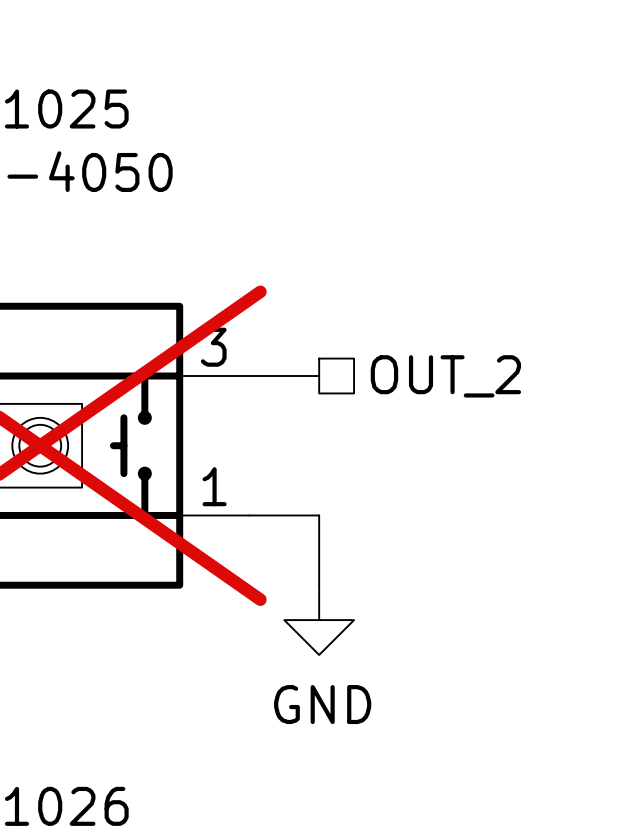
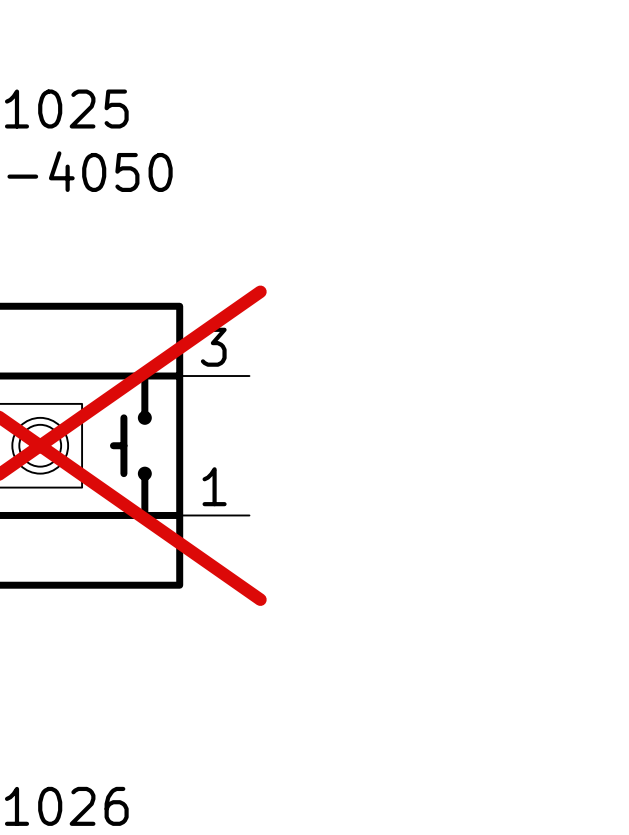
wire: (249, 376) (319, 376) -> none
hierarchical label: OUT_2 (445, 376) -> none
wire: (249, 515) (319, 515) (319, 585) -> none
power symbol: GND (319, 620) -> none

